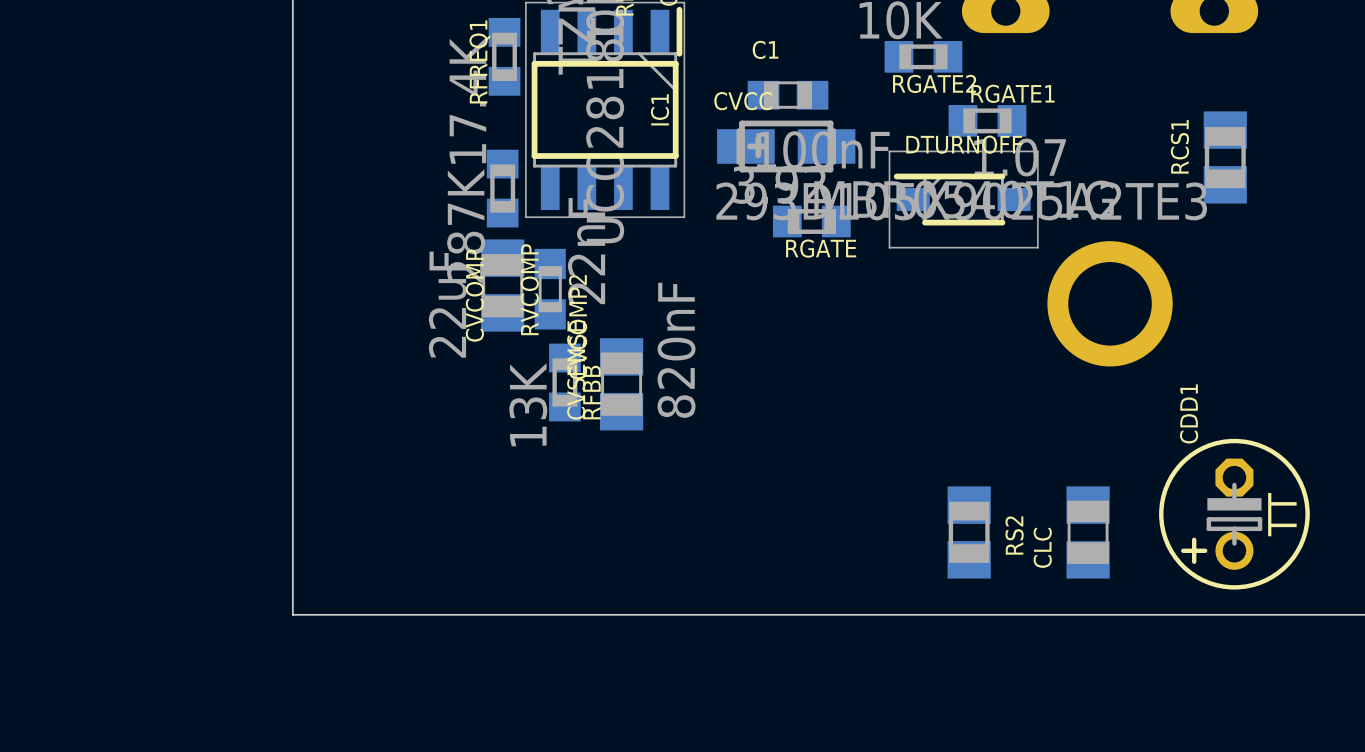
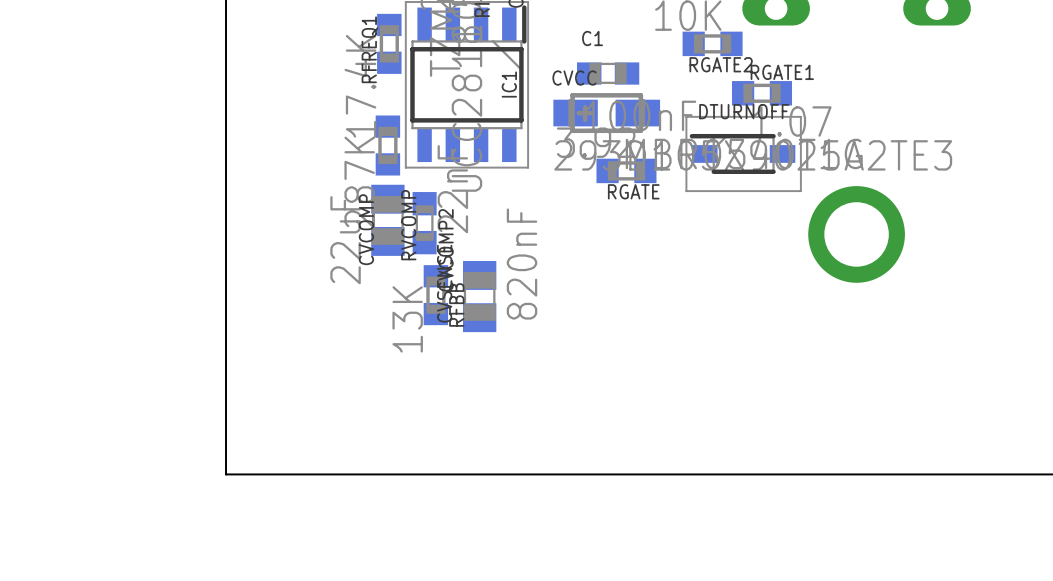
RCS1: (1225, 157) -> none
CDD1: (1234, 514) -> none
RS2: (969, 532) -> none
CLC: (1088, 532) -> none

